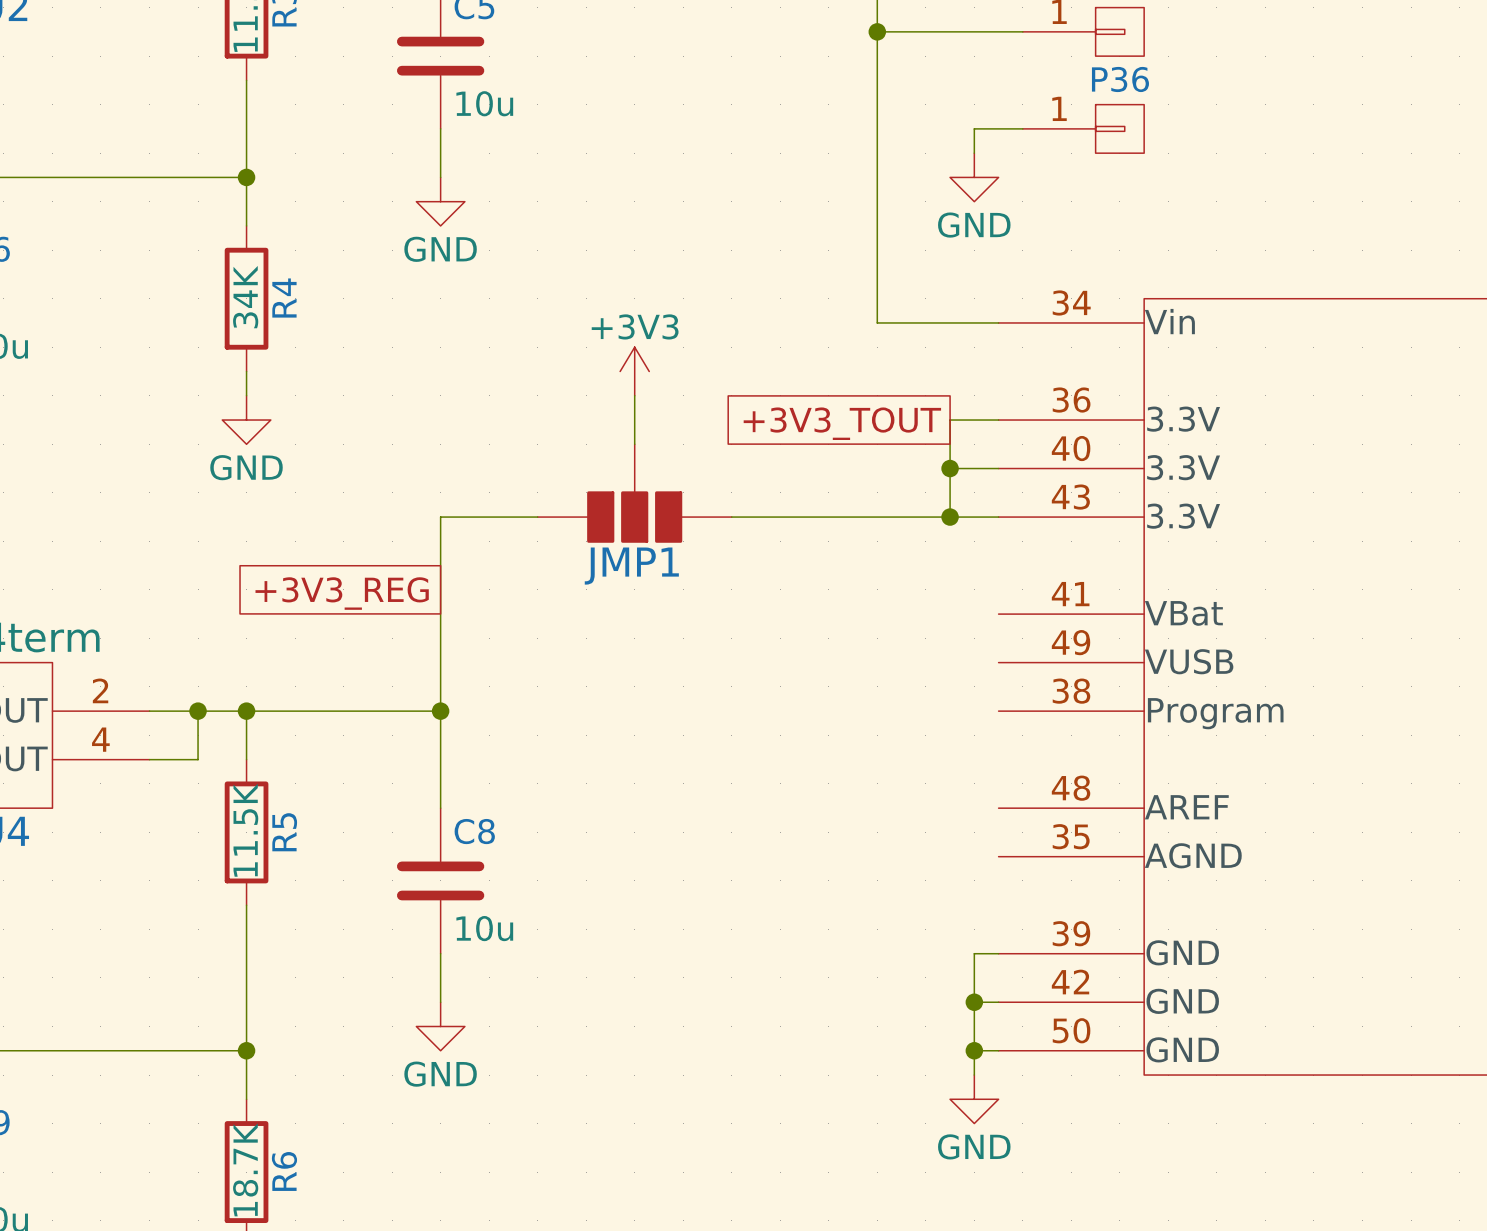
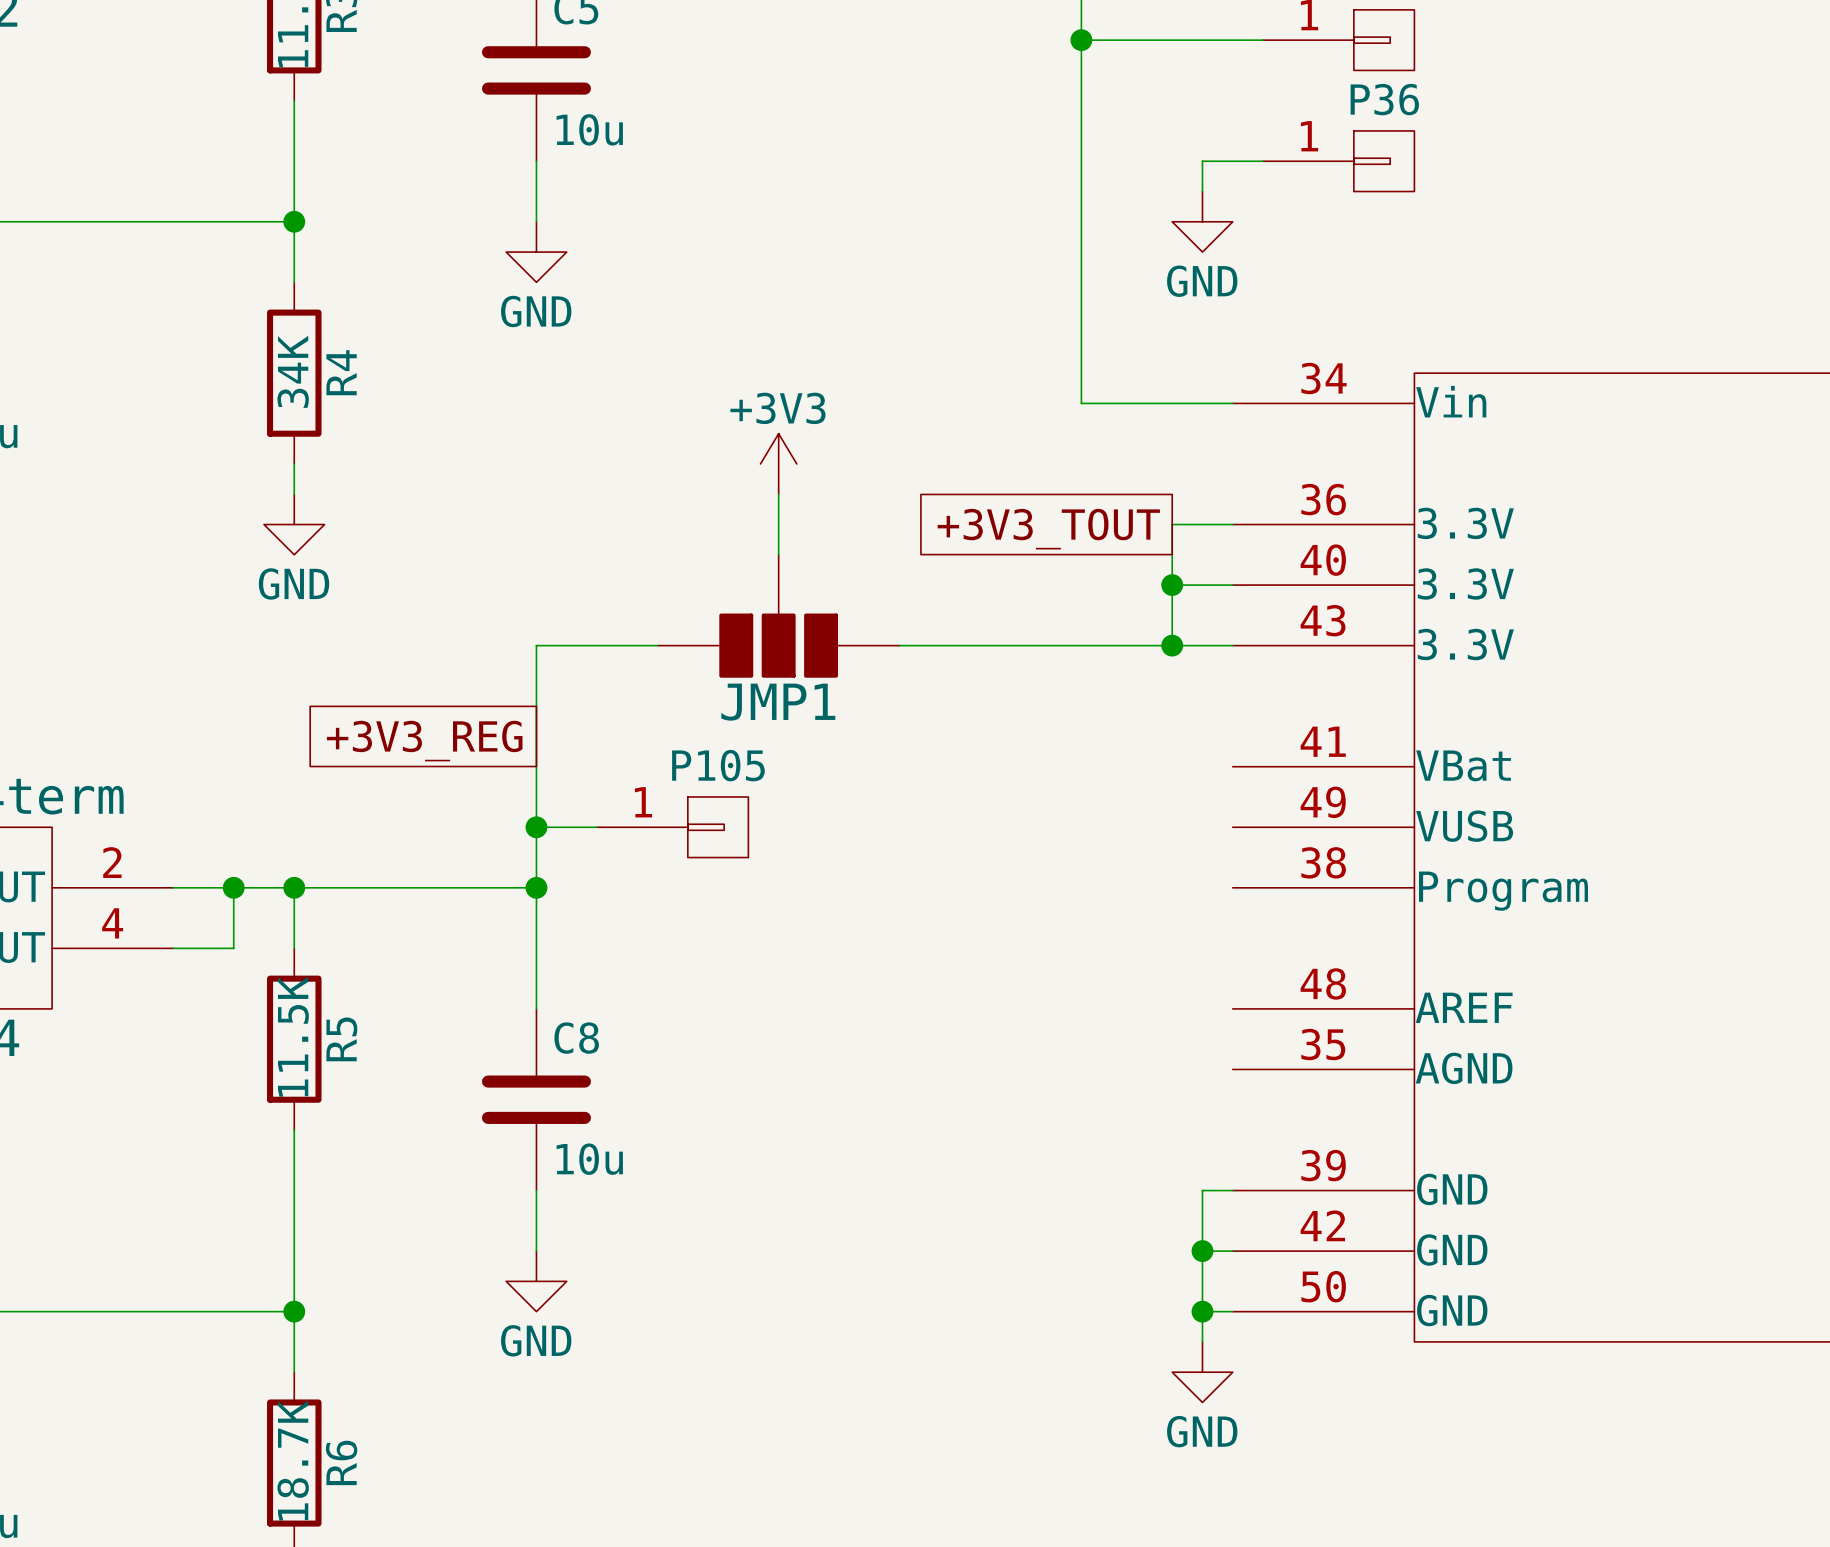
wire: none -> (536, 827) (597, 827)
junction: none -> (536, 827)
P105: none -> (672, 827)

